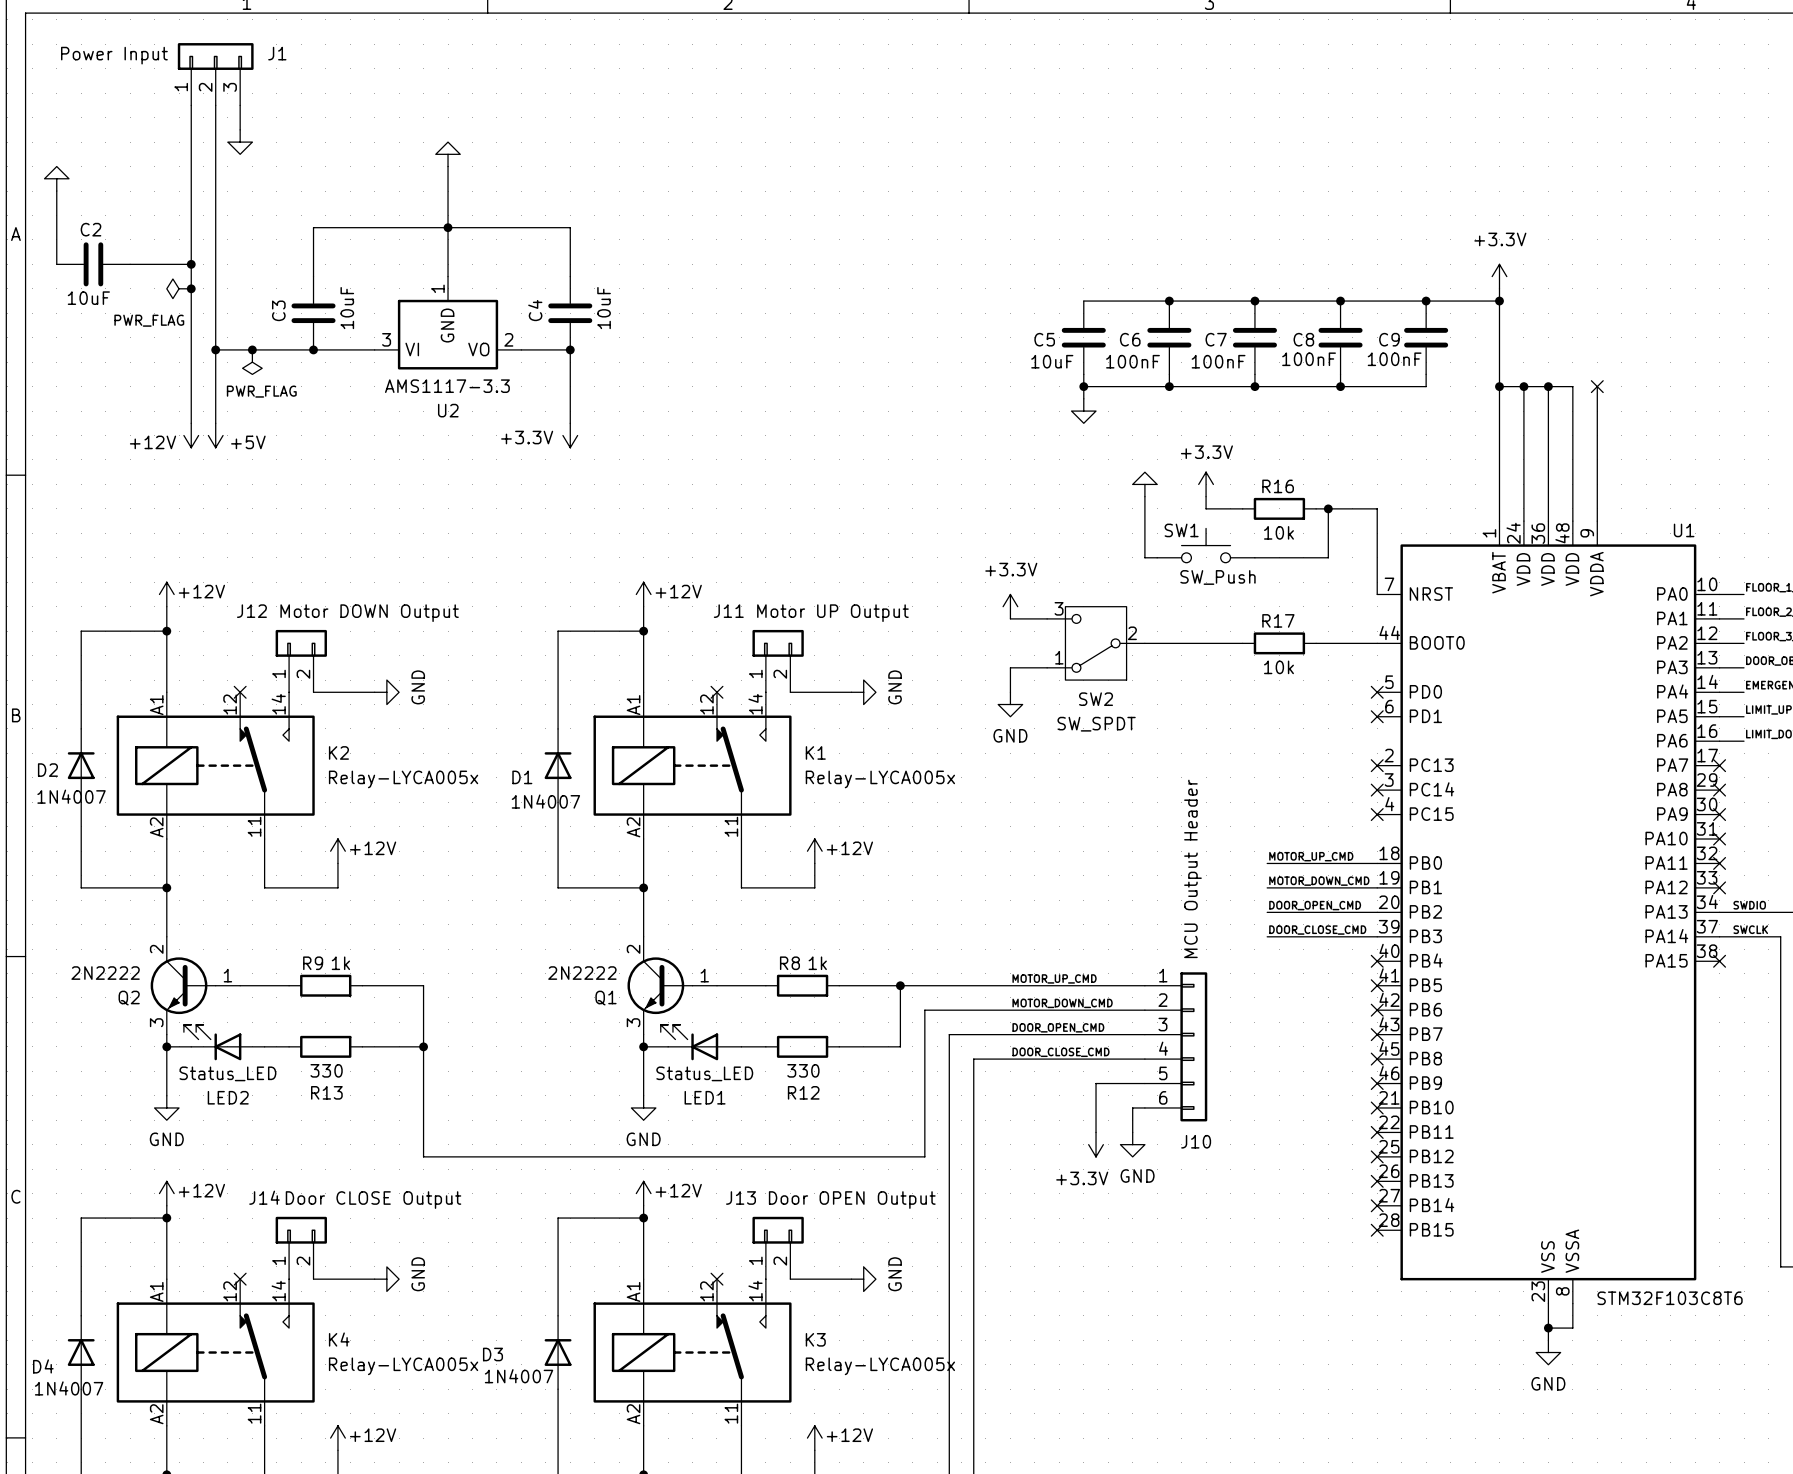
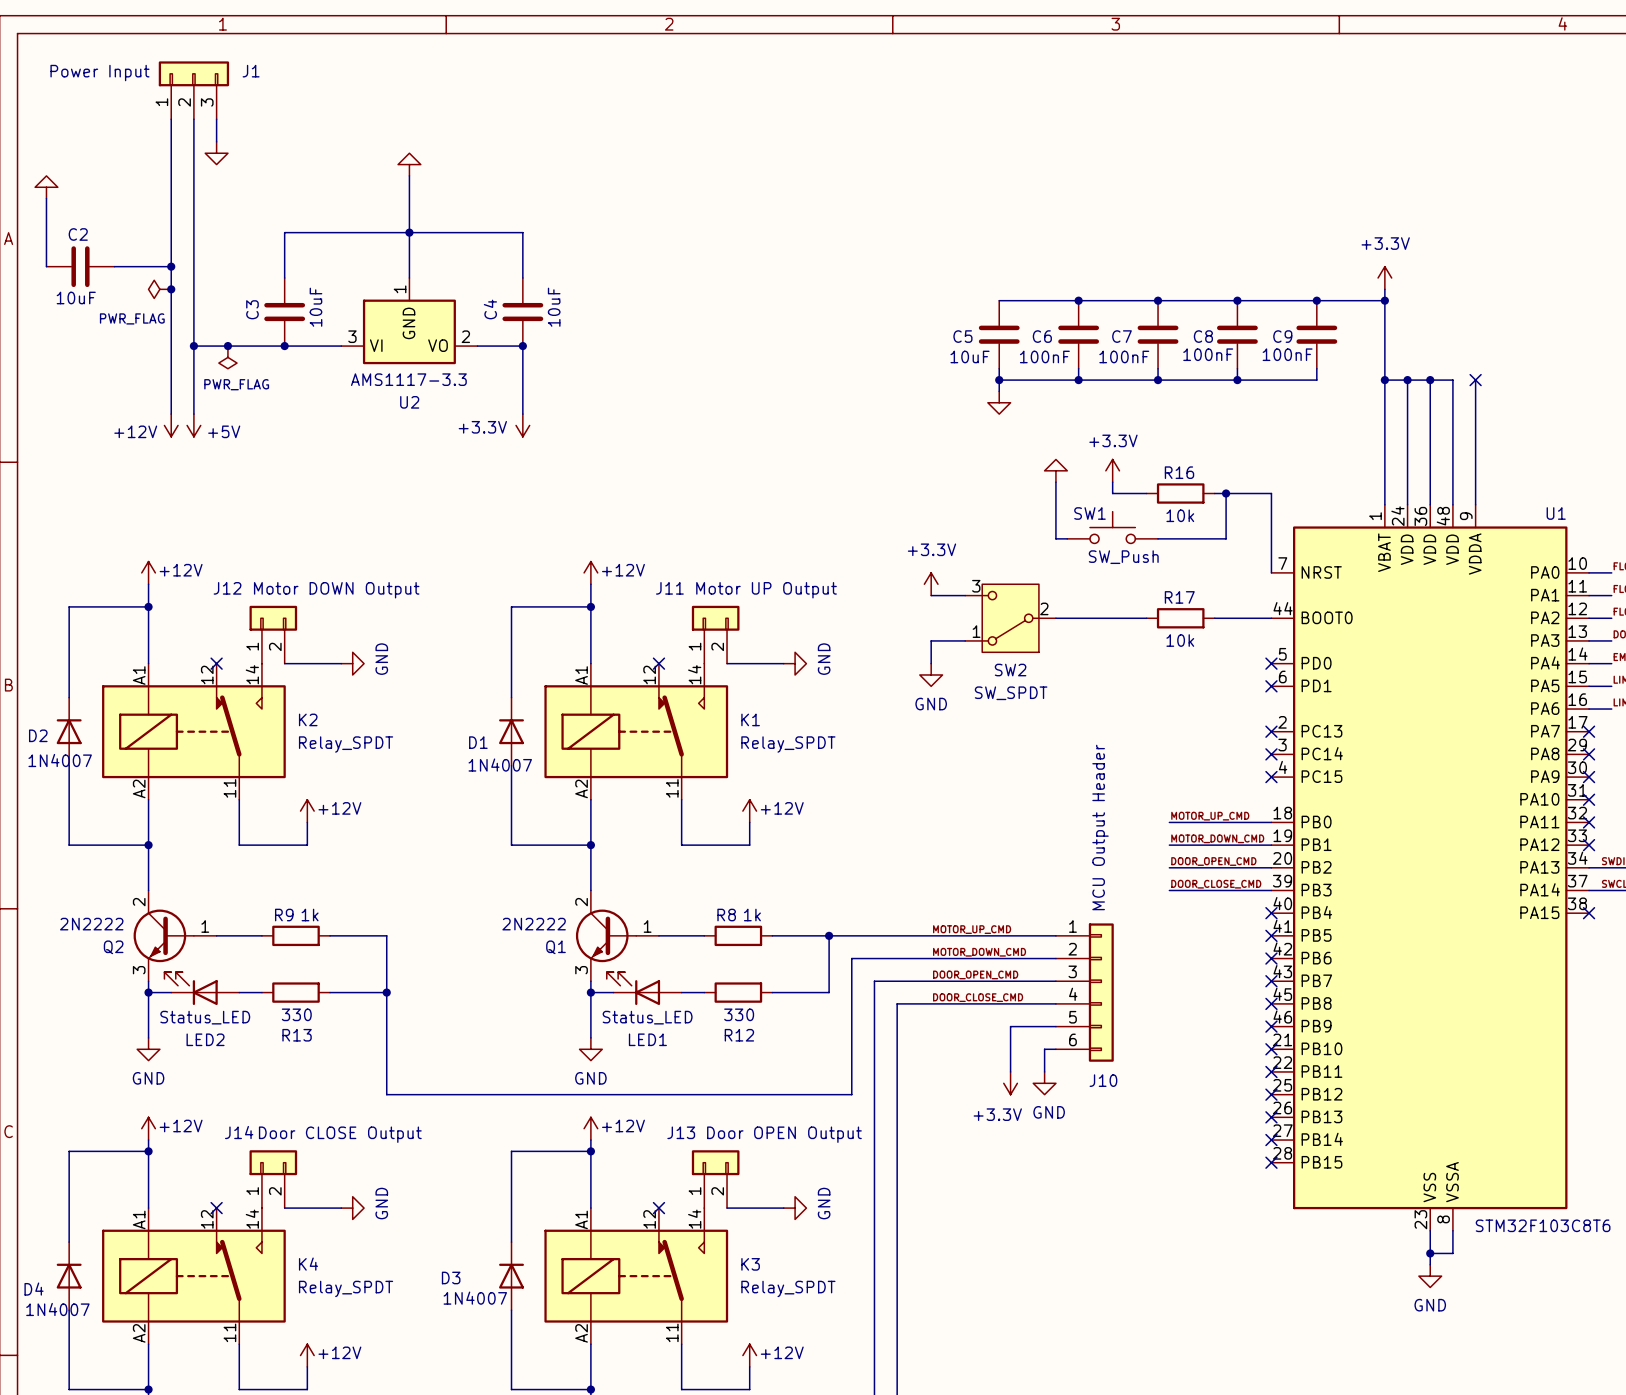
K2 value: Relay-LYCA005x (403, 779) -> Relay_SPDT (346, 744)
K1 value: Relay-LYCA005x (880, 779) -> Relay_SPDT (788, 744)
K4 value: Relay-LYCA005x (403, 1366) -> Relay_SPDT (346, 1288)
K3 value: Relay-LYCA005x (880, 1366) -> Relay_SPDT (788, 1288)

